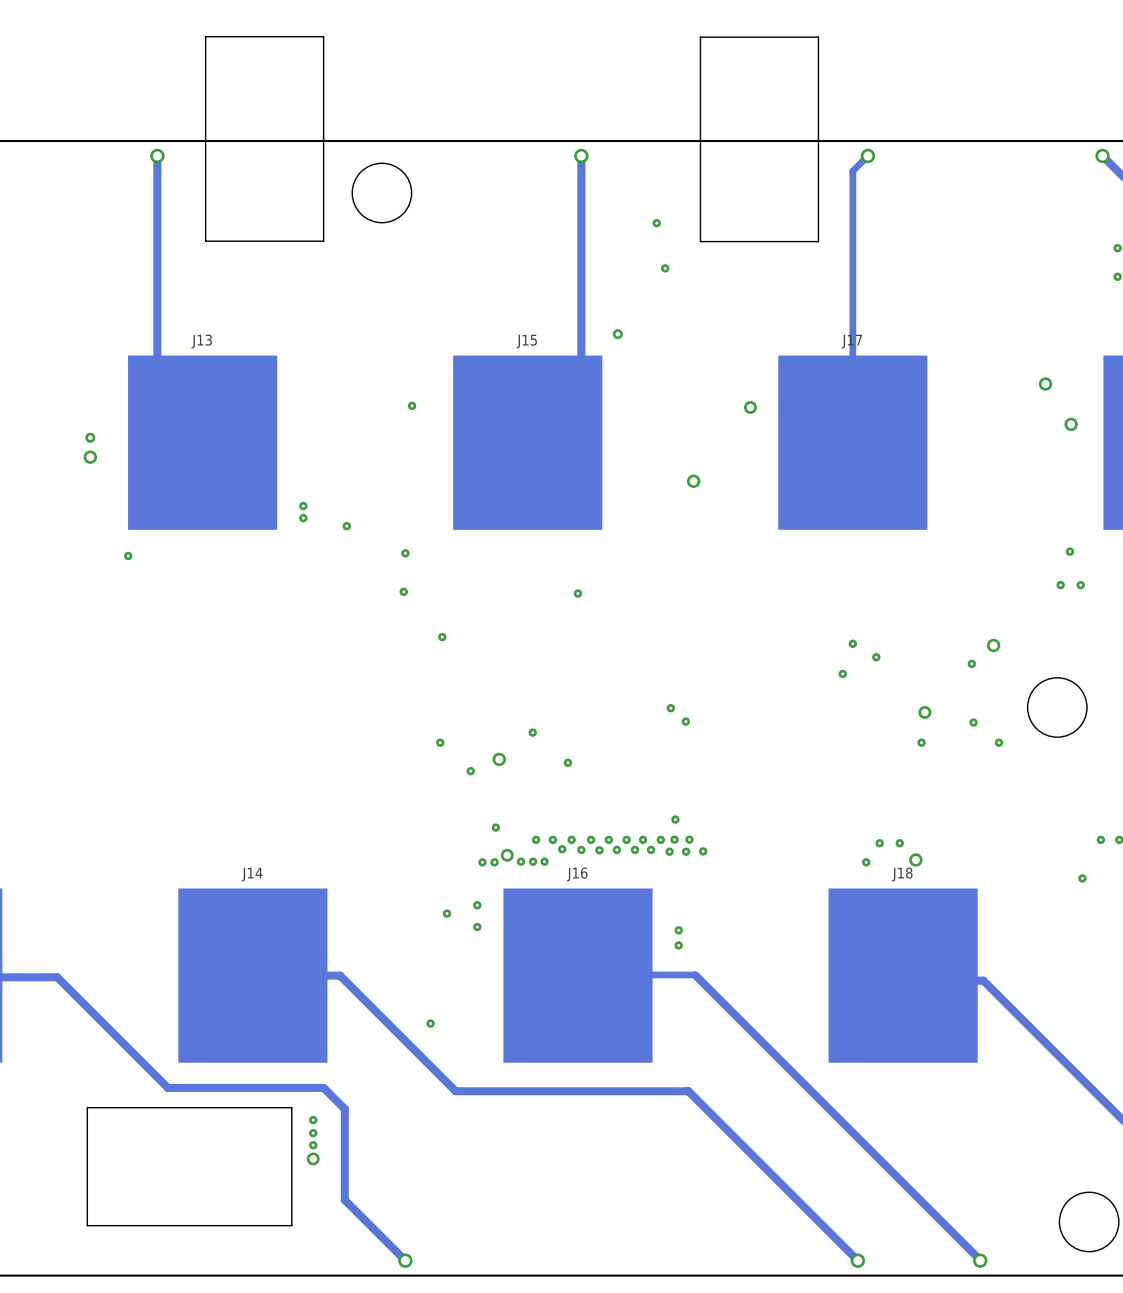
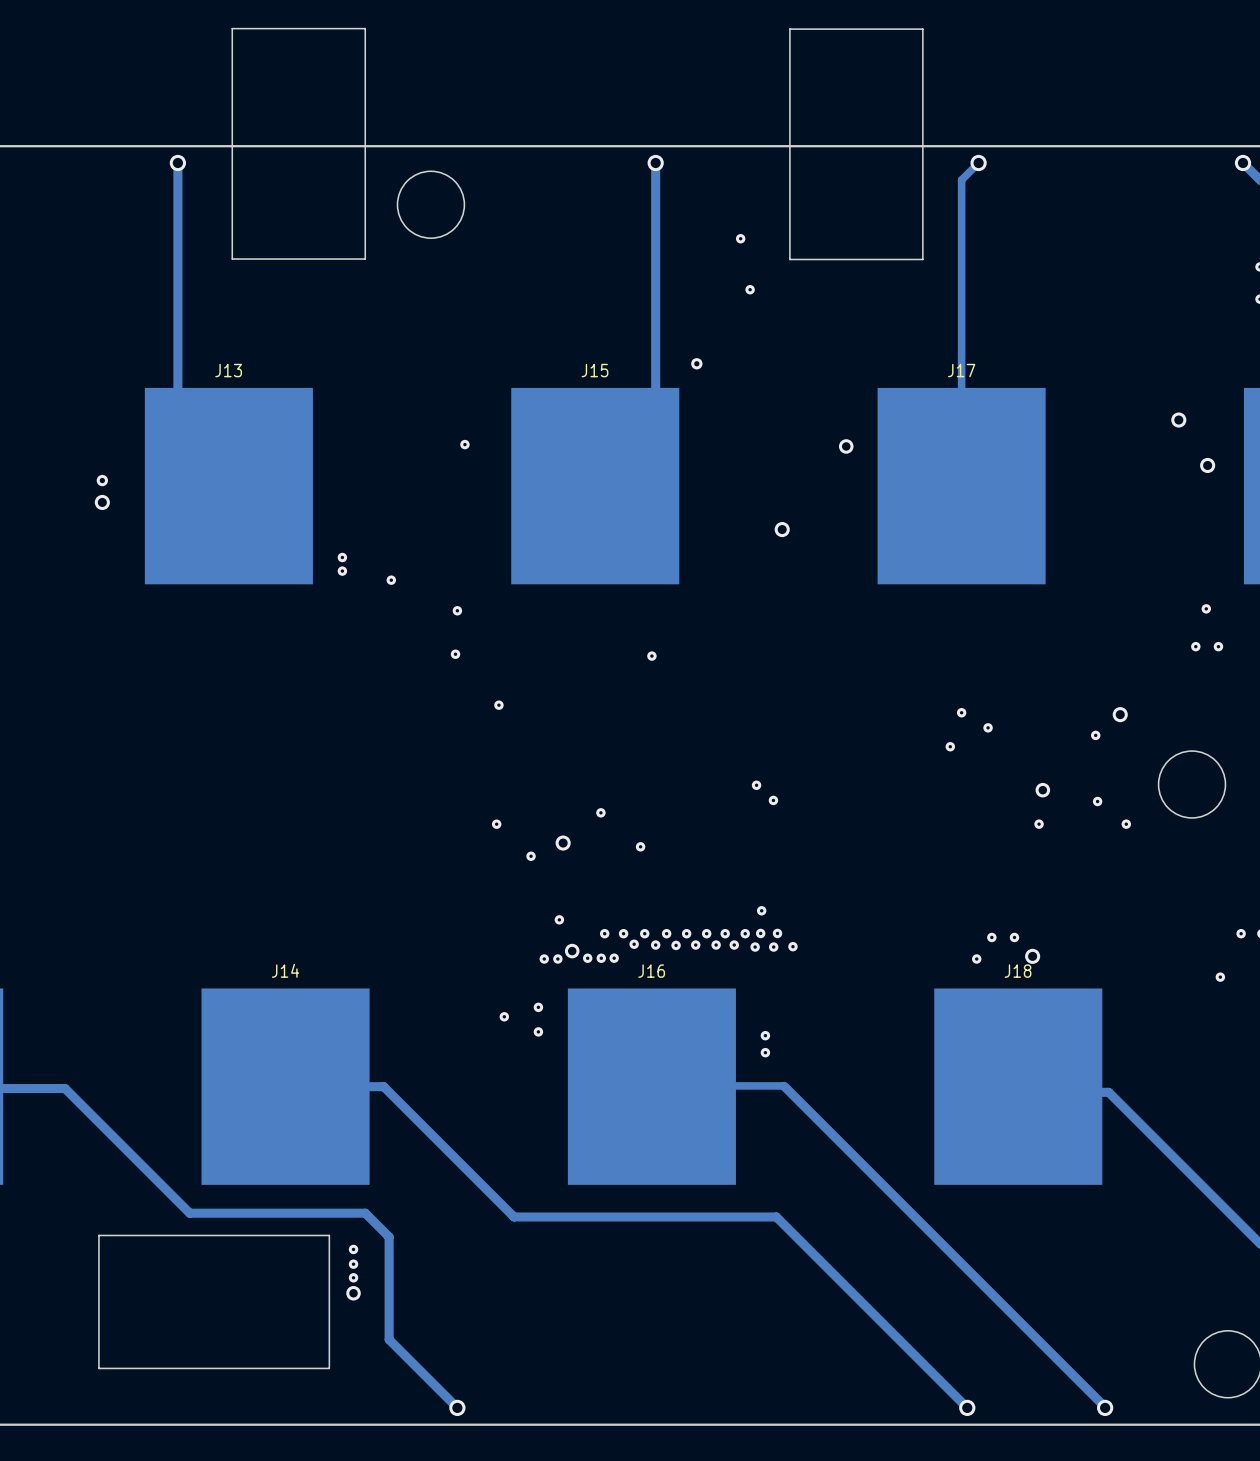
via: (128, 555) -> none
via: (430, 1023) -> none

